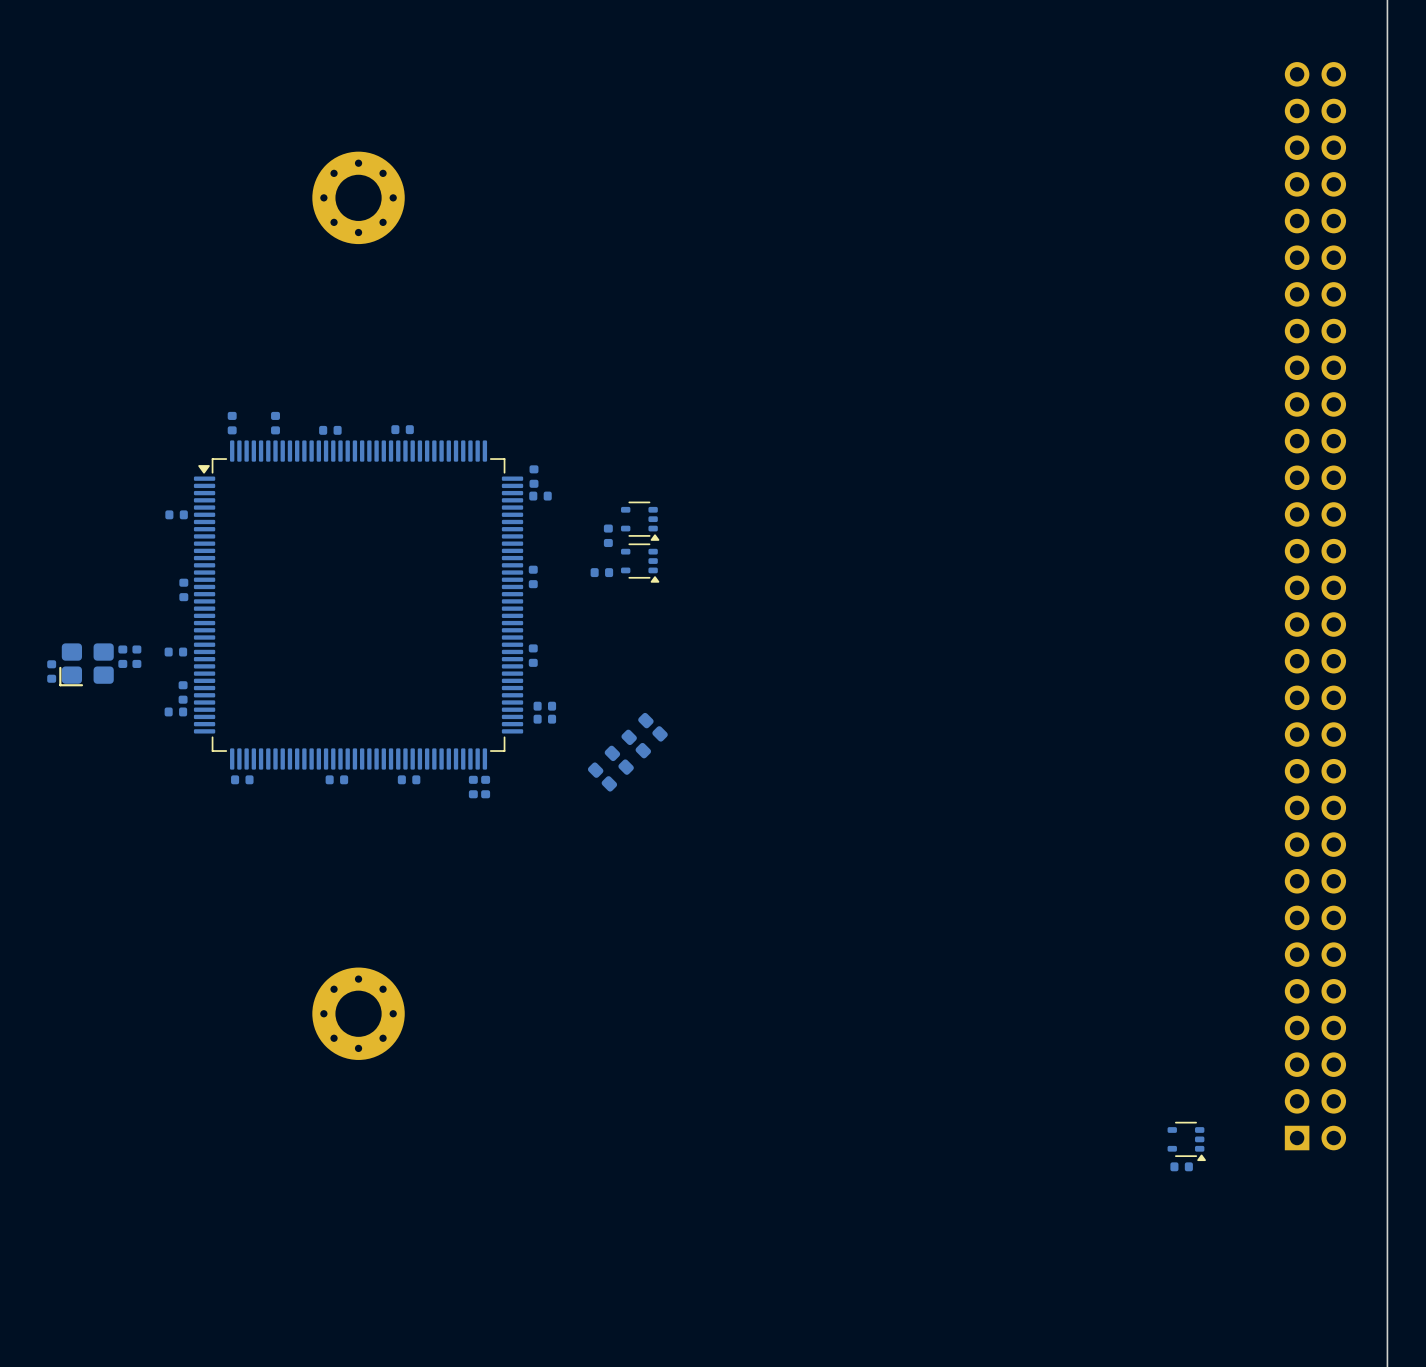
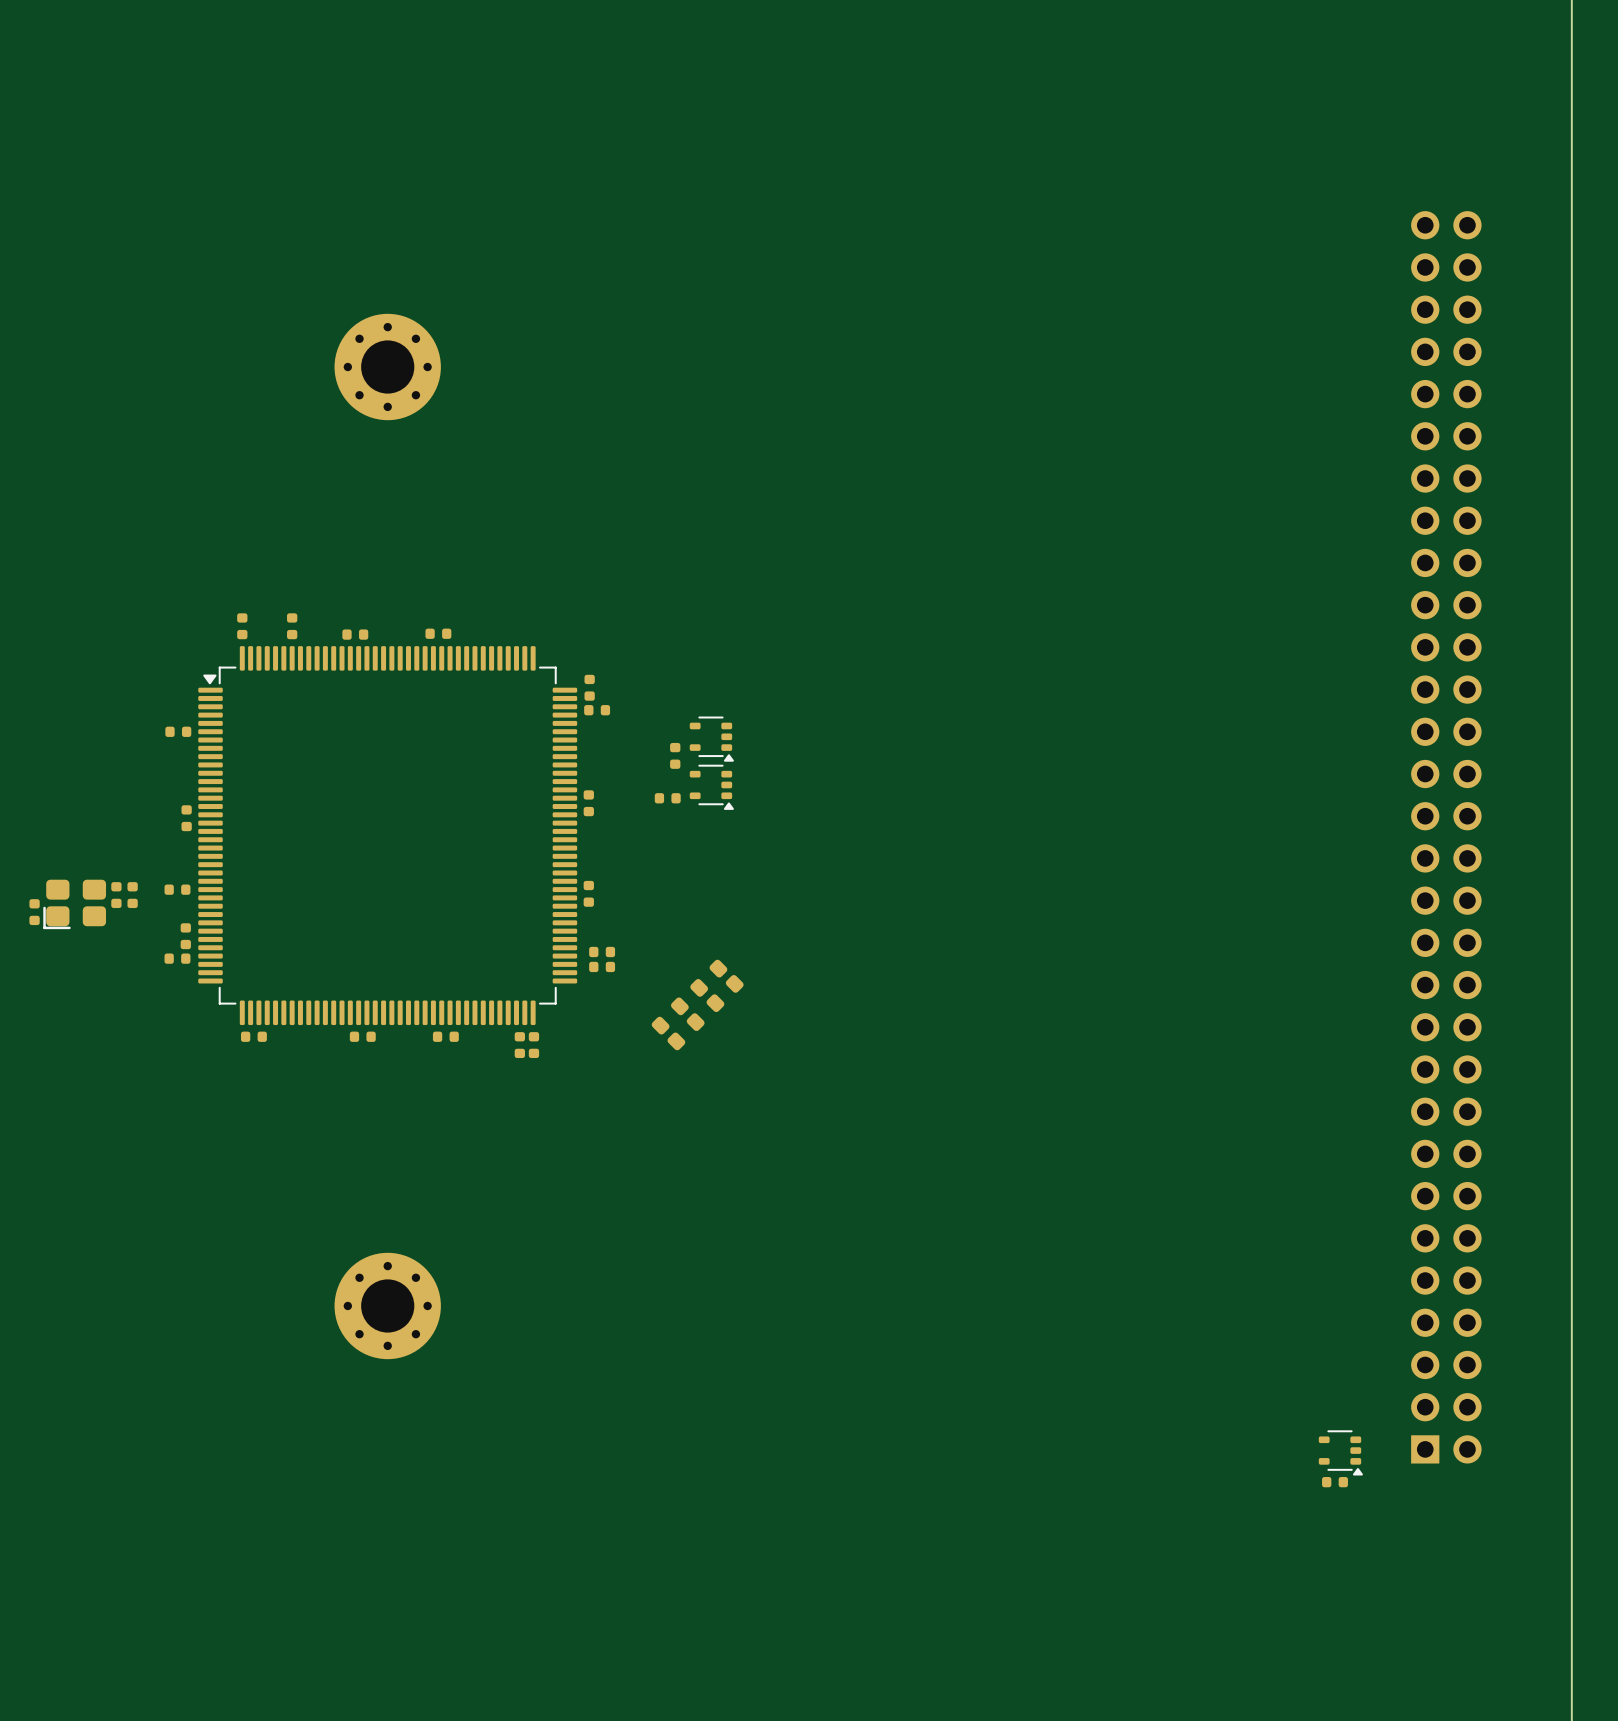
part position: (1315, 606) -> (1446, 837)

